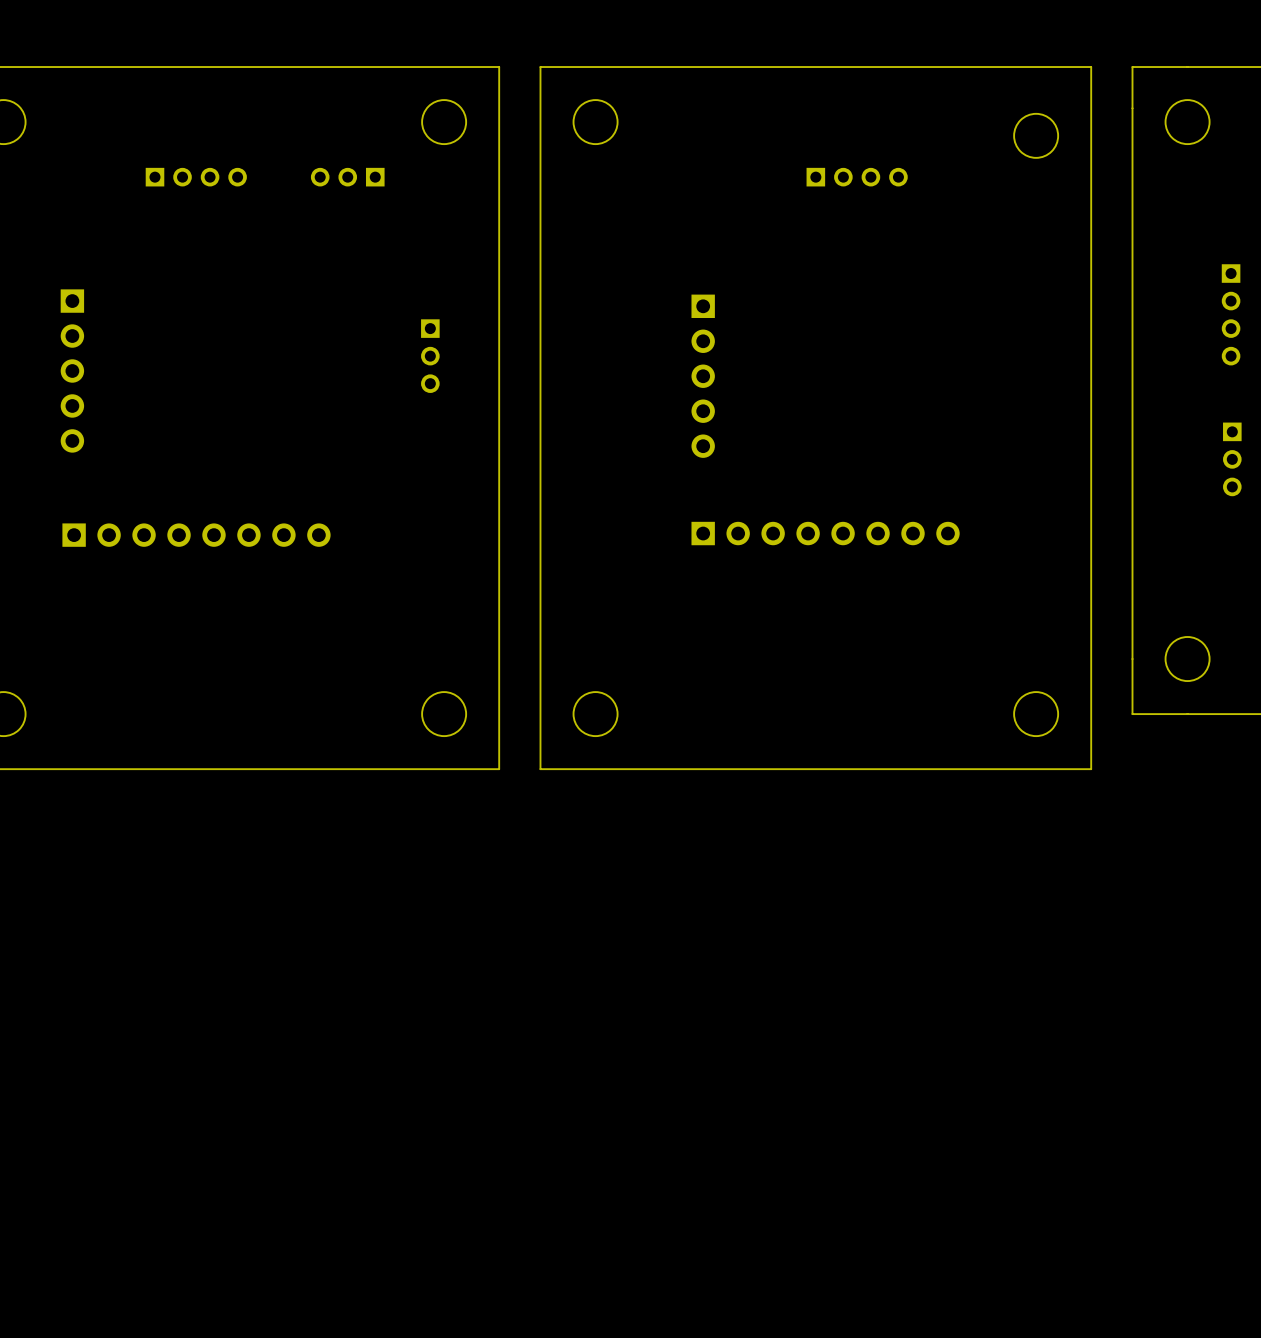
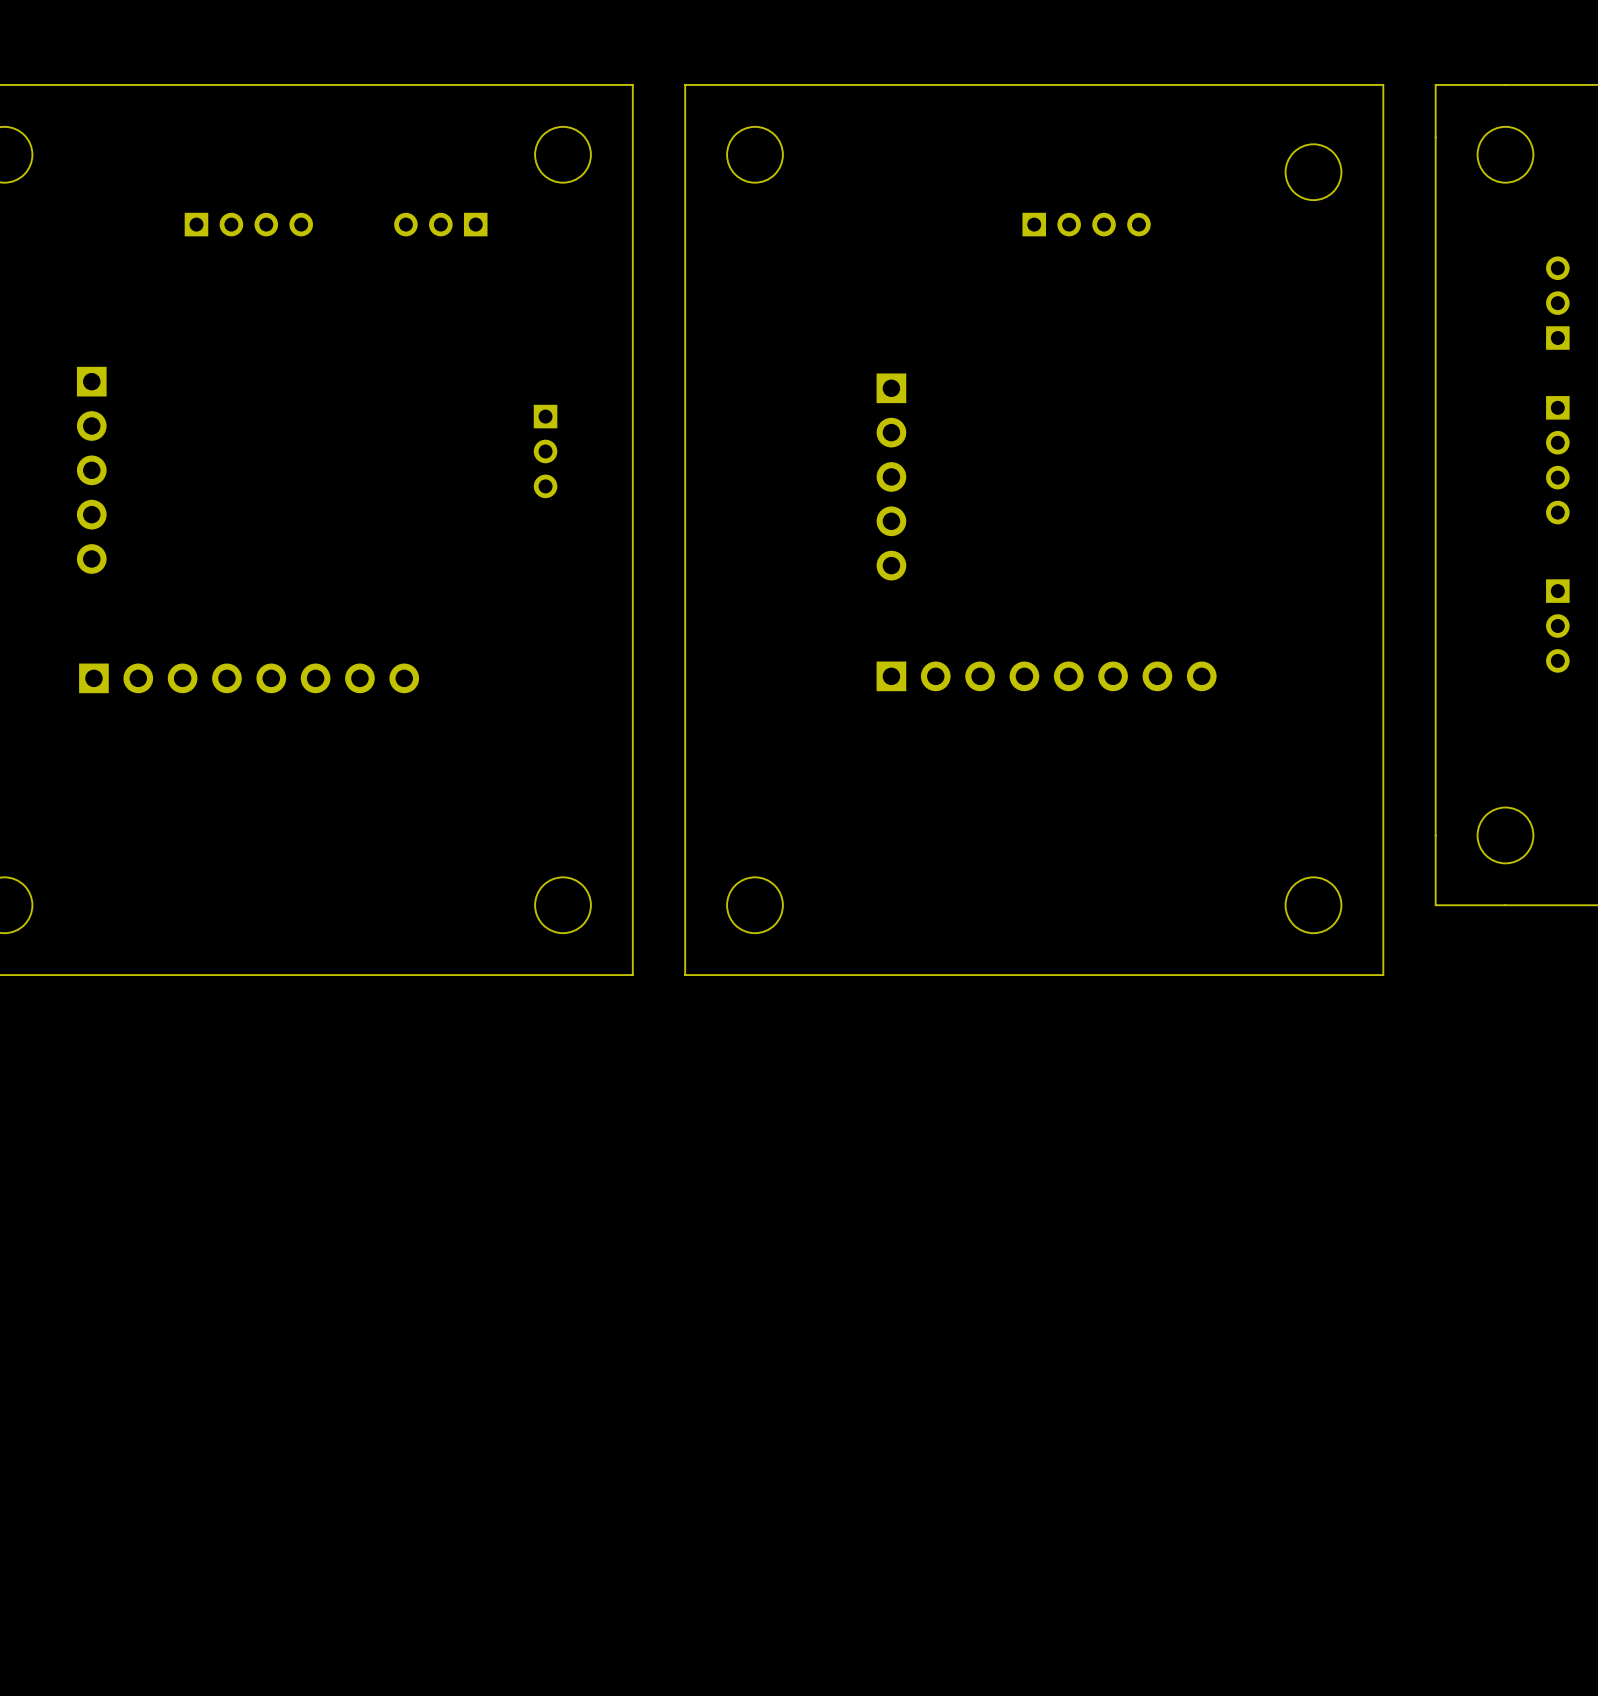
part: none -> (1557, 303)
part position: (1231, 314) -> (1557, 460)
part position: (1232, 459) -> (1557, 626)

